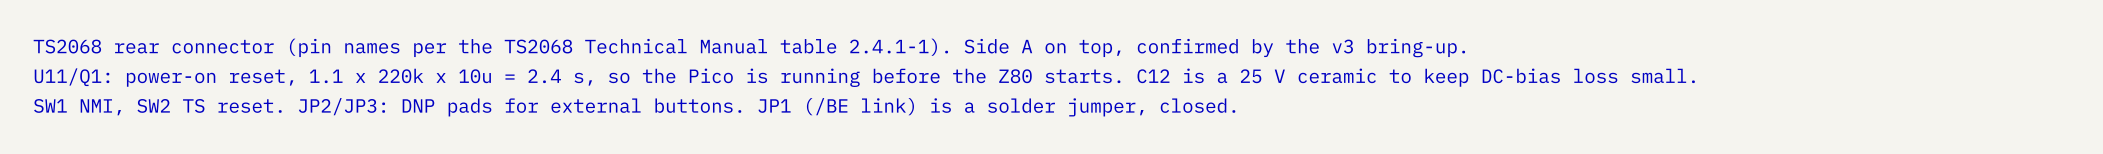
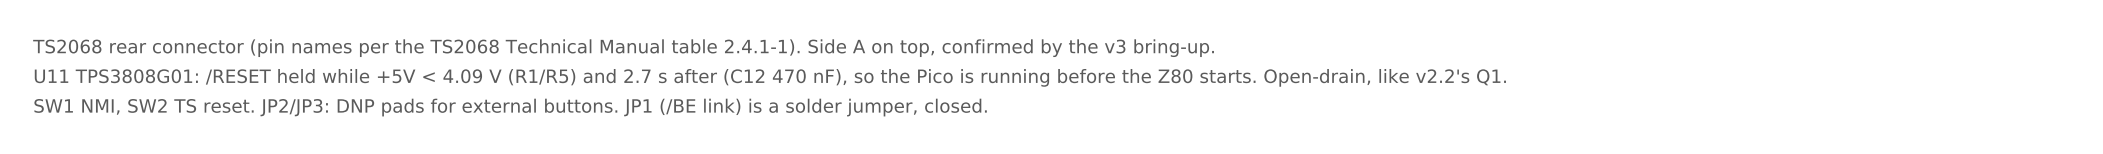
text: U11/Q1: power-on reset, 1.1 x 220k x 10u = 2.4 s, so the Pico is running before the Z80 starts. C12 is a 25 V ceramic to keep DC-bias loss small. (864, 77) -> U11 TPS3808G01: /RESET held while +5V < 4.09 V (R1/R5) and 2.7 s after (C12 470 nF), so the Pico is running before the Z80 starts. Open-drain, like v2.2's Q1. (770, 77)

